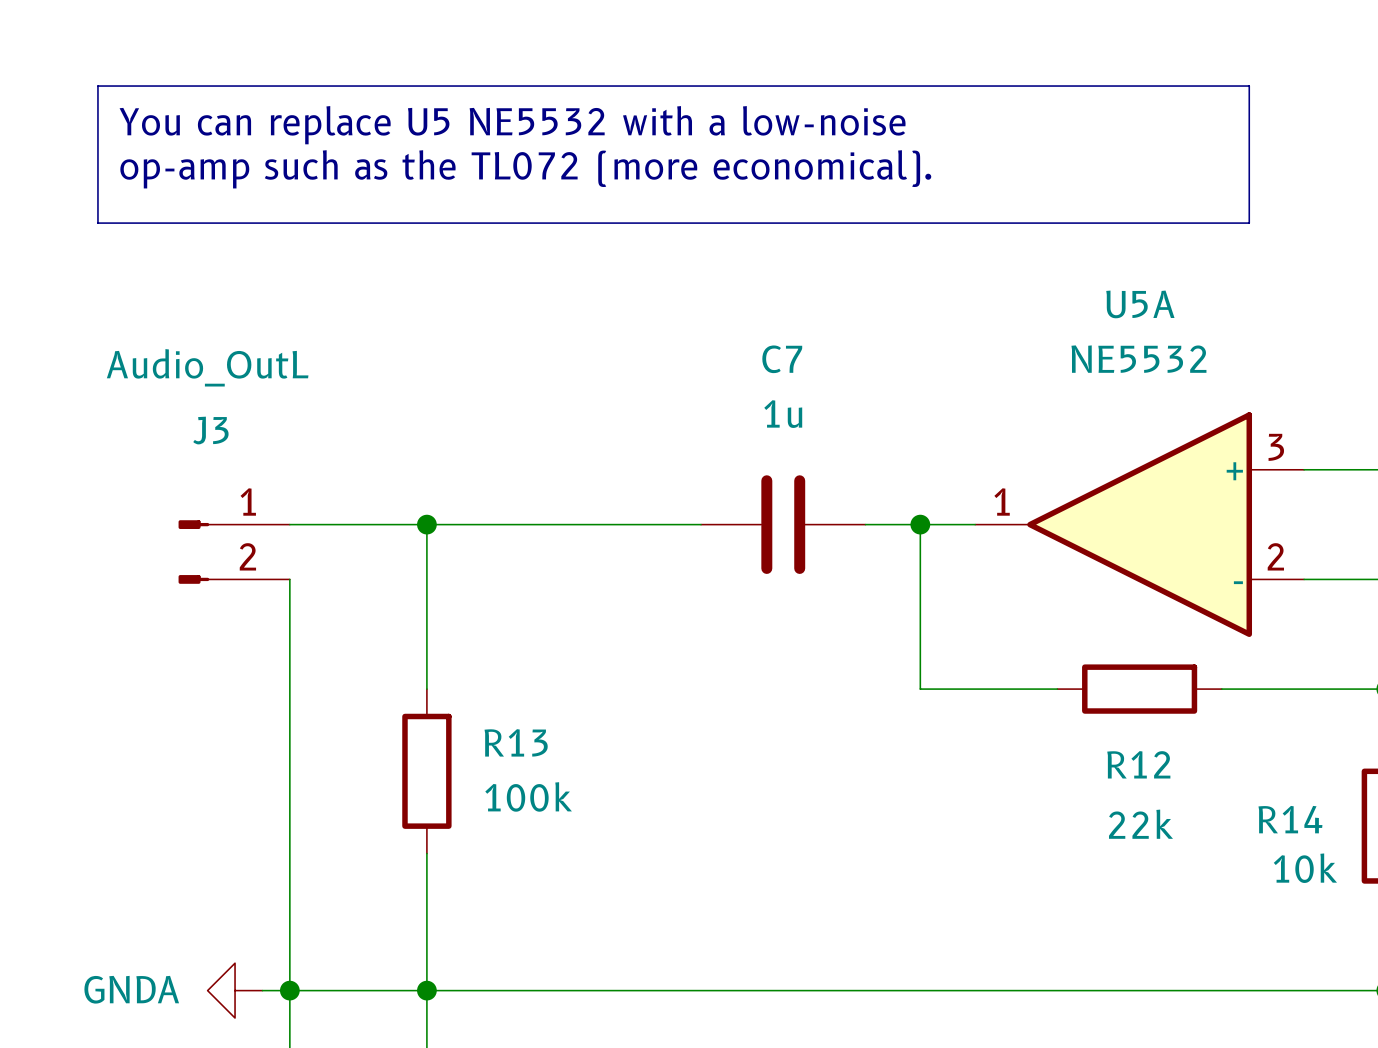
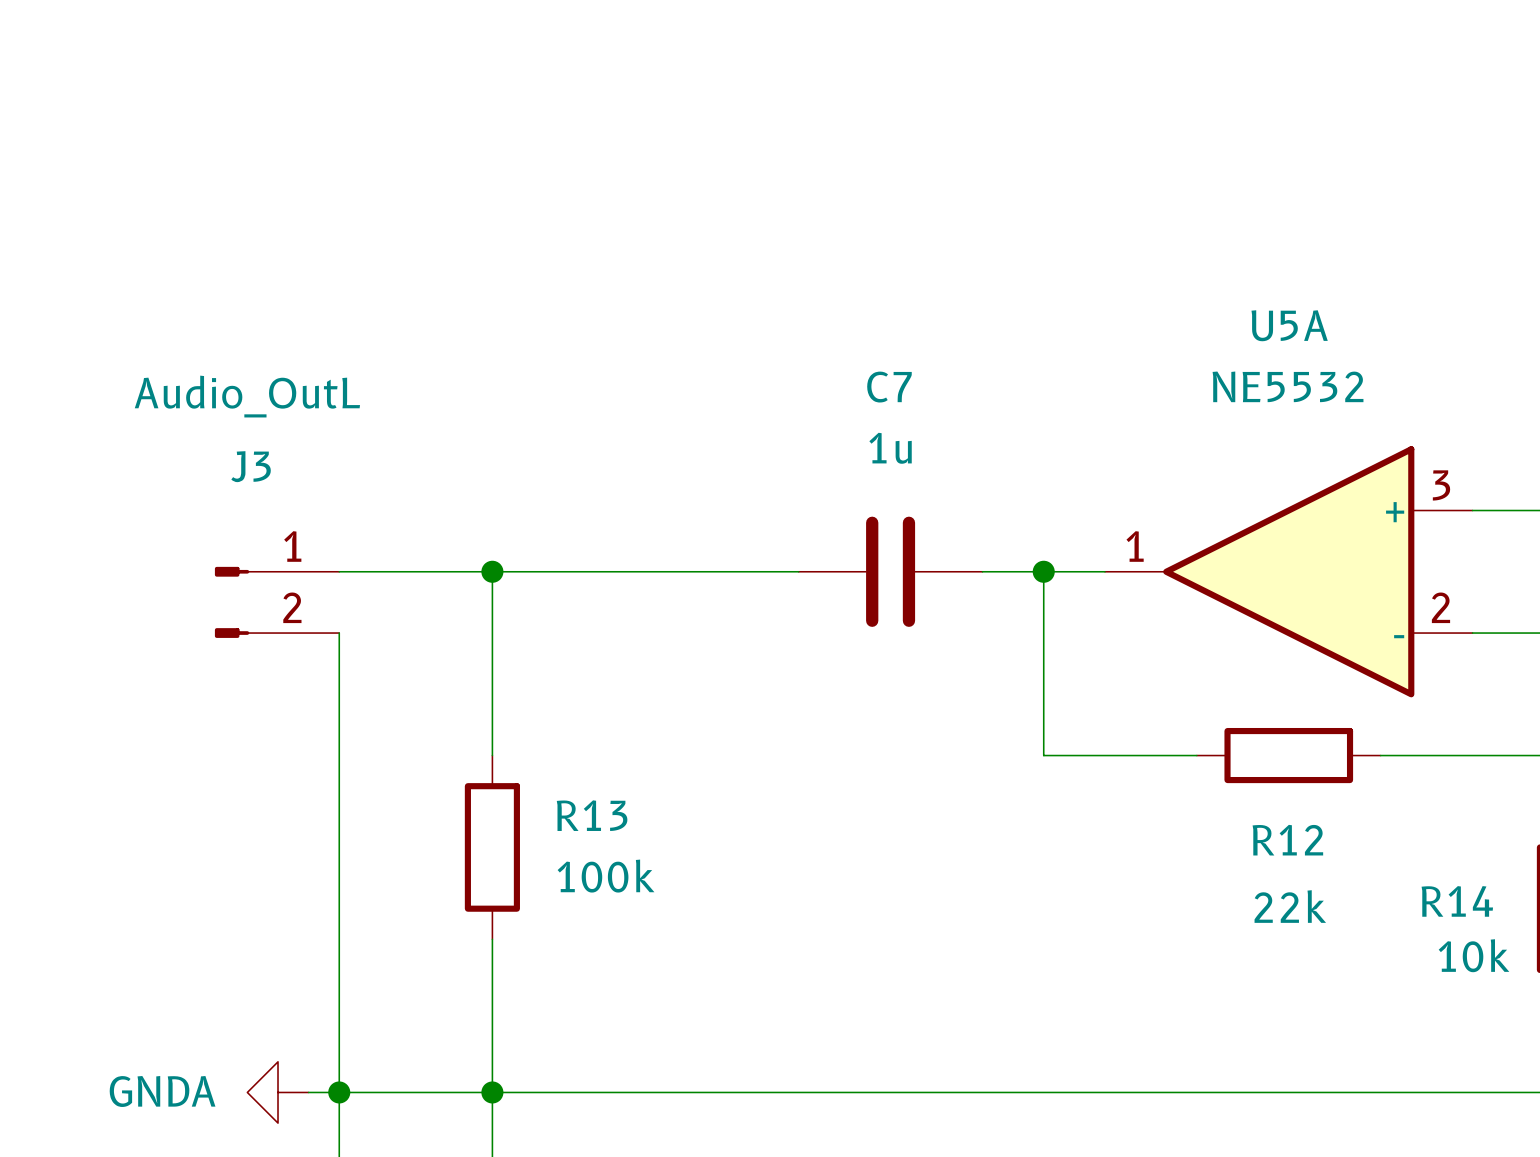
line: (97, 86) (1249, 86) (1249, 223) (97, 223) (97, 86) -> none
text: You can replace U5 NE5532 with a low-noise (512, 125) -> none
text: op-amp such as the TL072 (more economical). (525, 169) -> none

